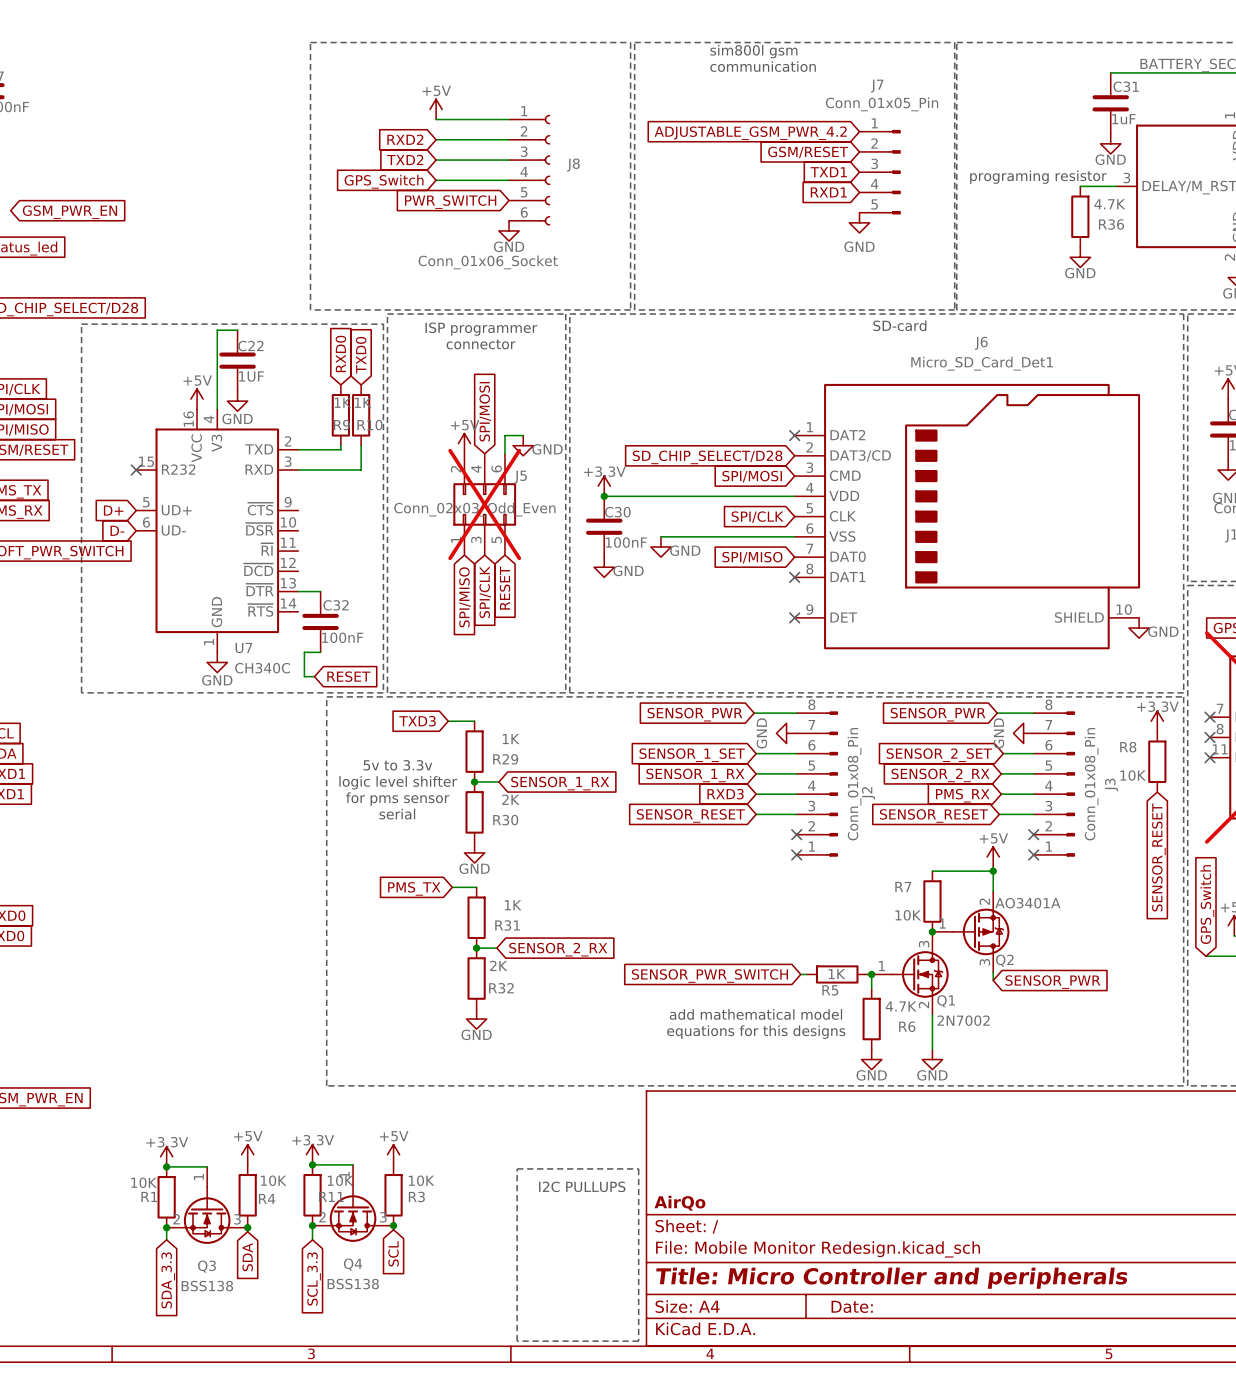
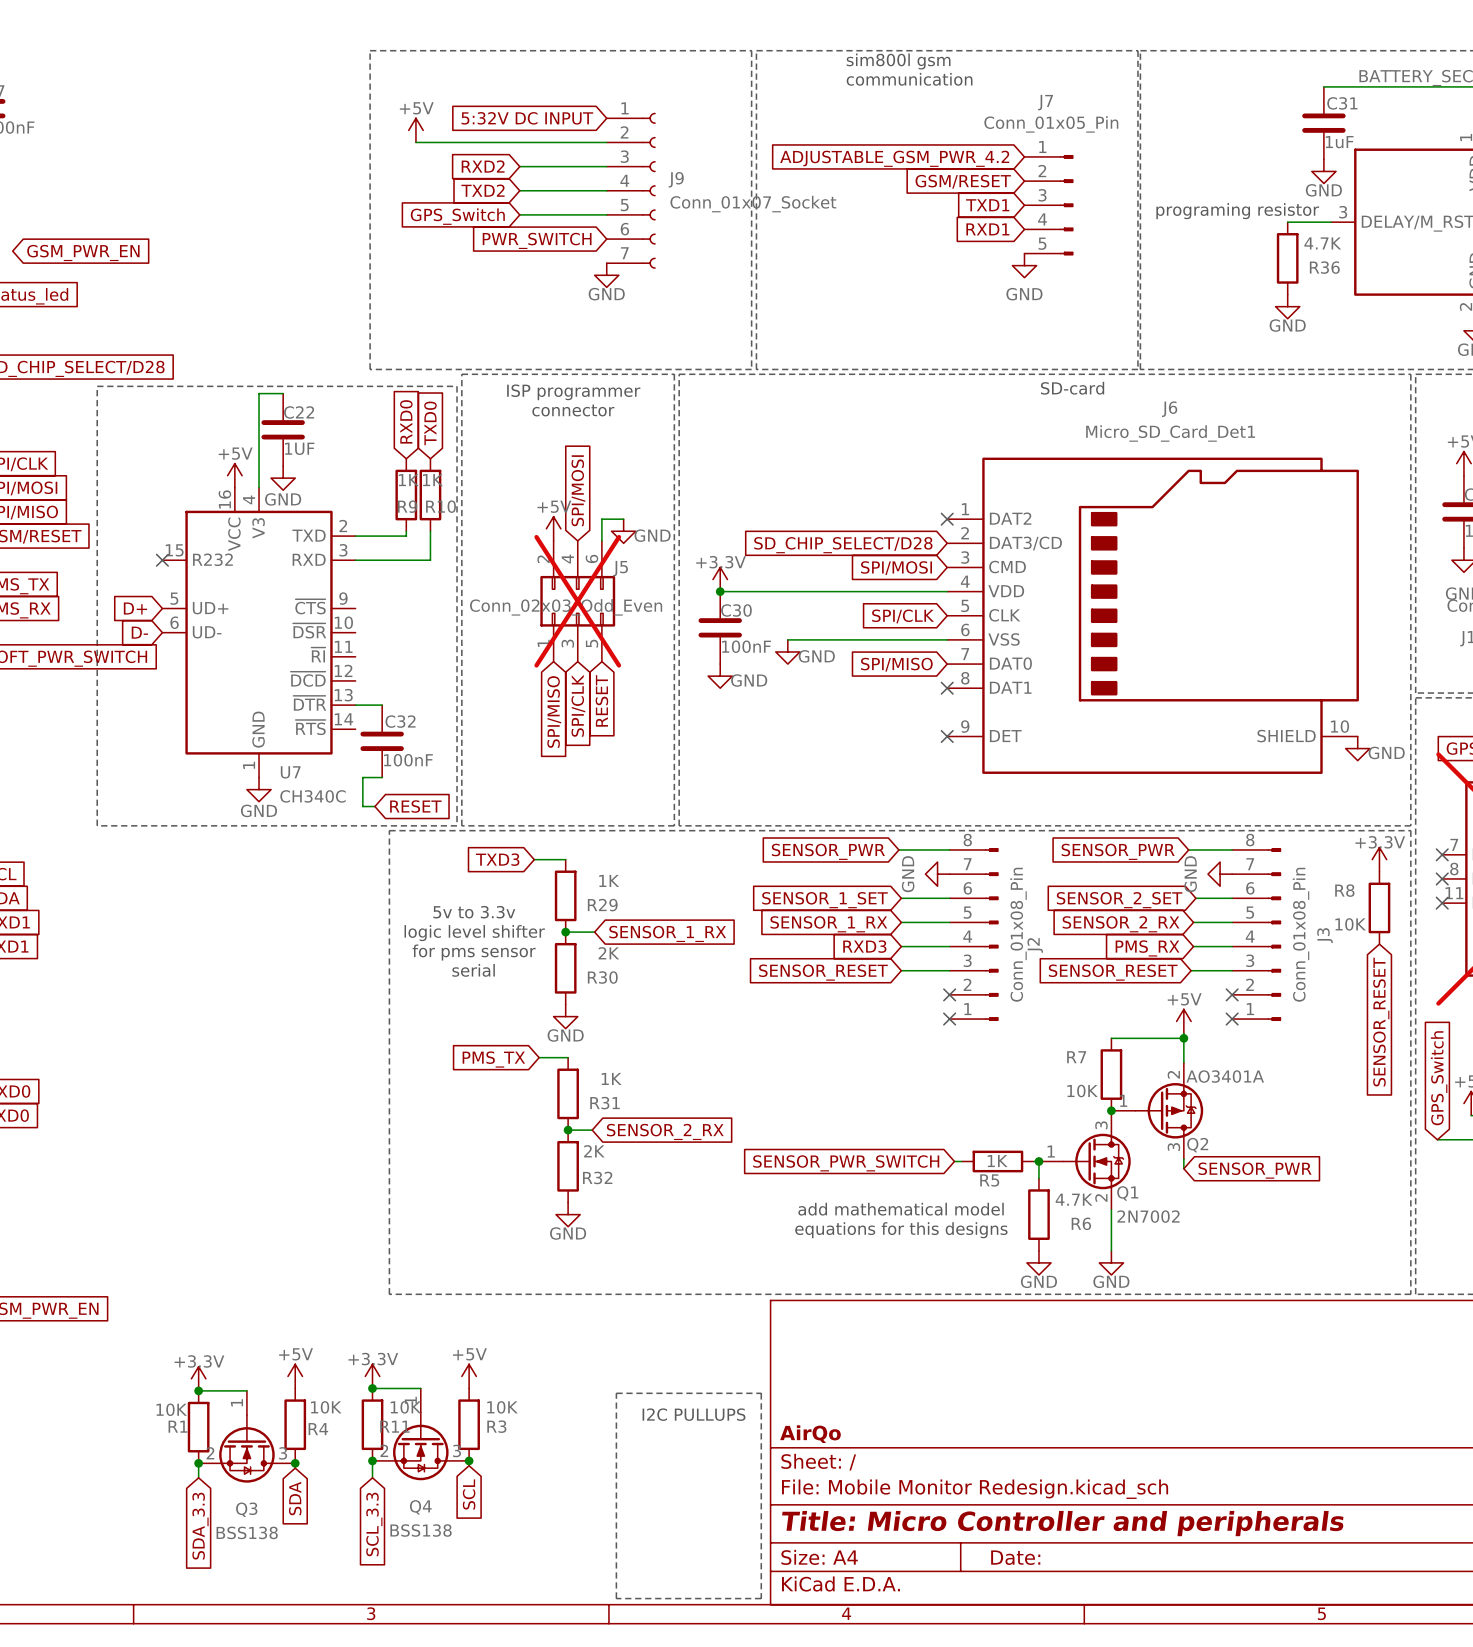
global label: none -> 5:32V DC INPUT (527, 118)
power symbol position: +5V (436, 109) -> +5V (415, 130)
wire: none -> (415, 142) (519, 142)
J9: none -> Conn_01x07_Socket (631, 190)
J8: Conn_01x06_Socket (529, 170) -> none

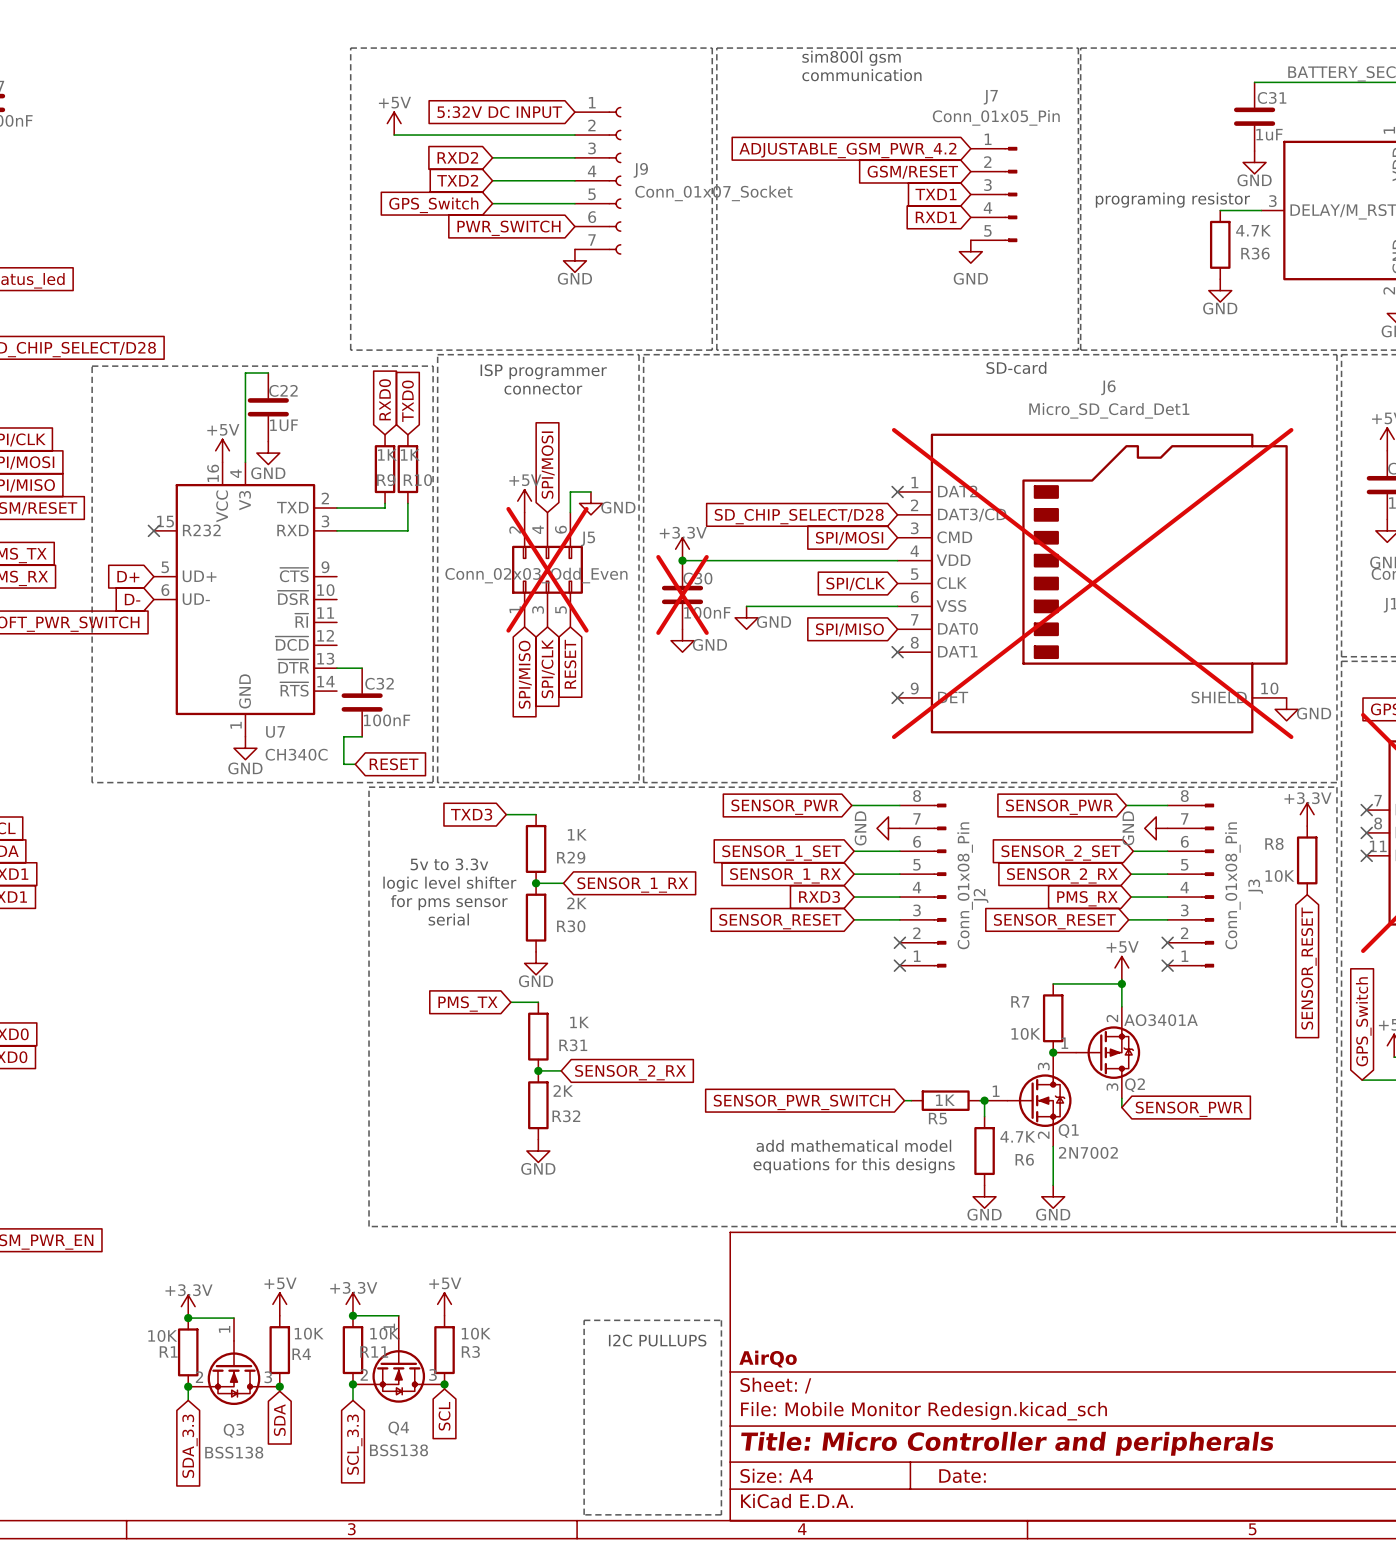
global label: GSM_PWR_EN (83, 252) -> none
J6 do-not-place cross: none -> (1092, 583)
C30 do-not-place cross: none -> (682, 594)

